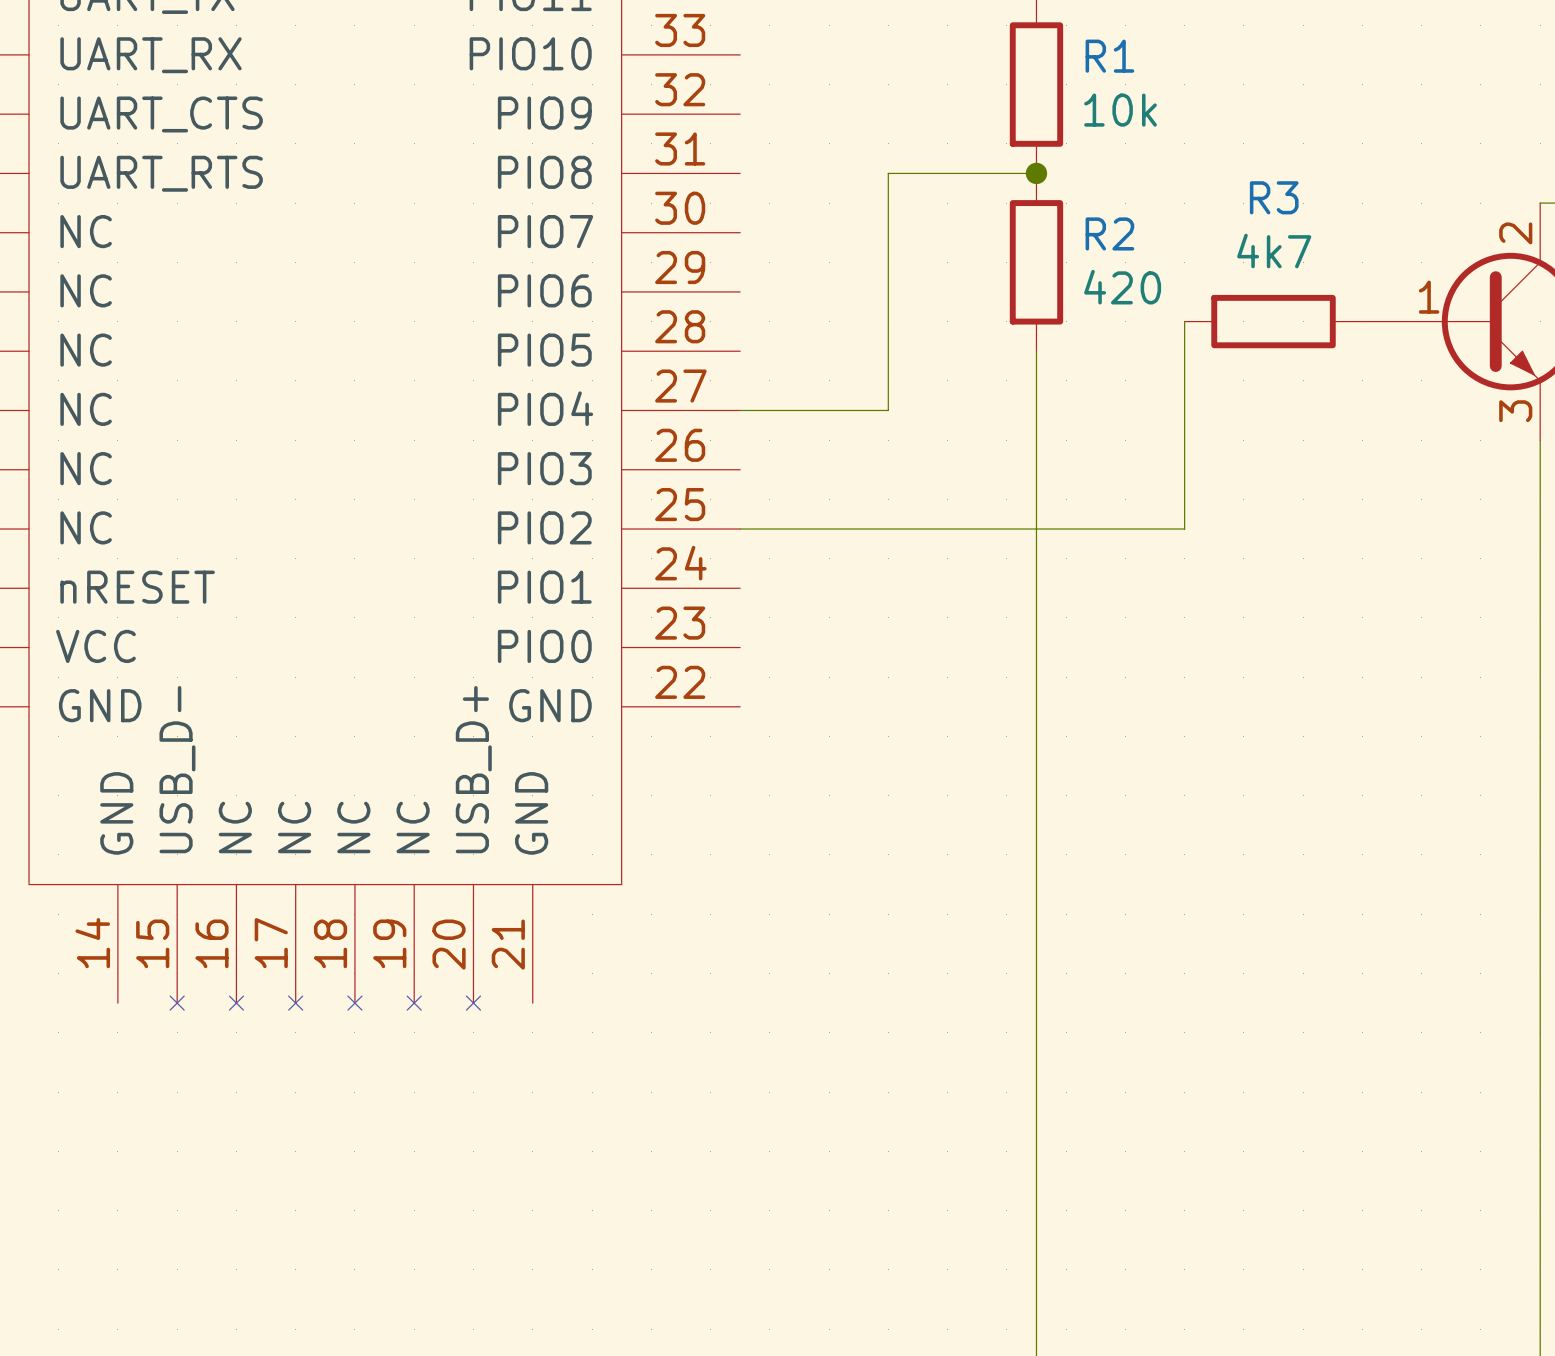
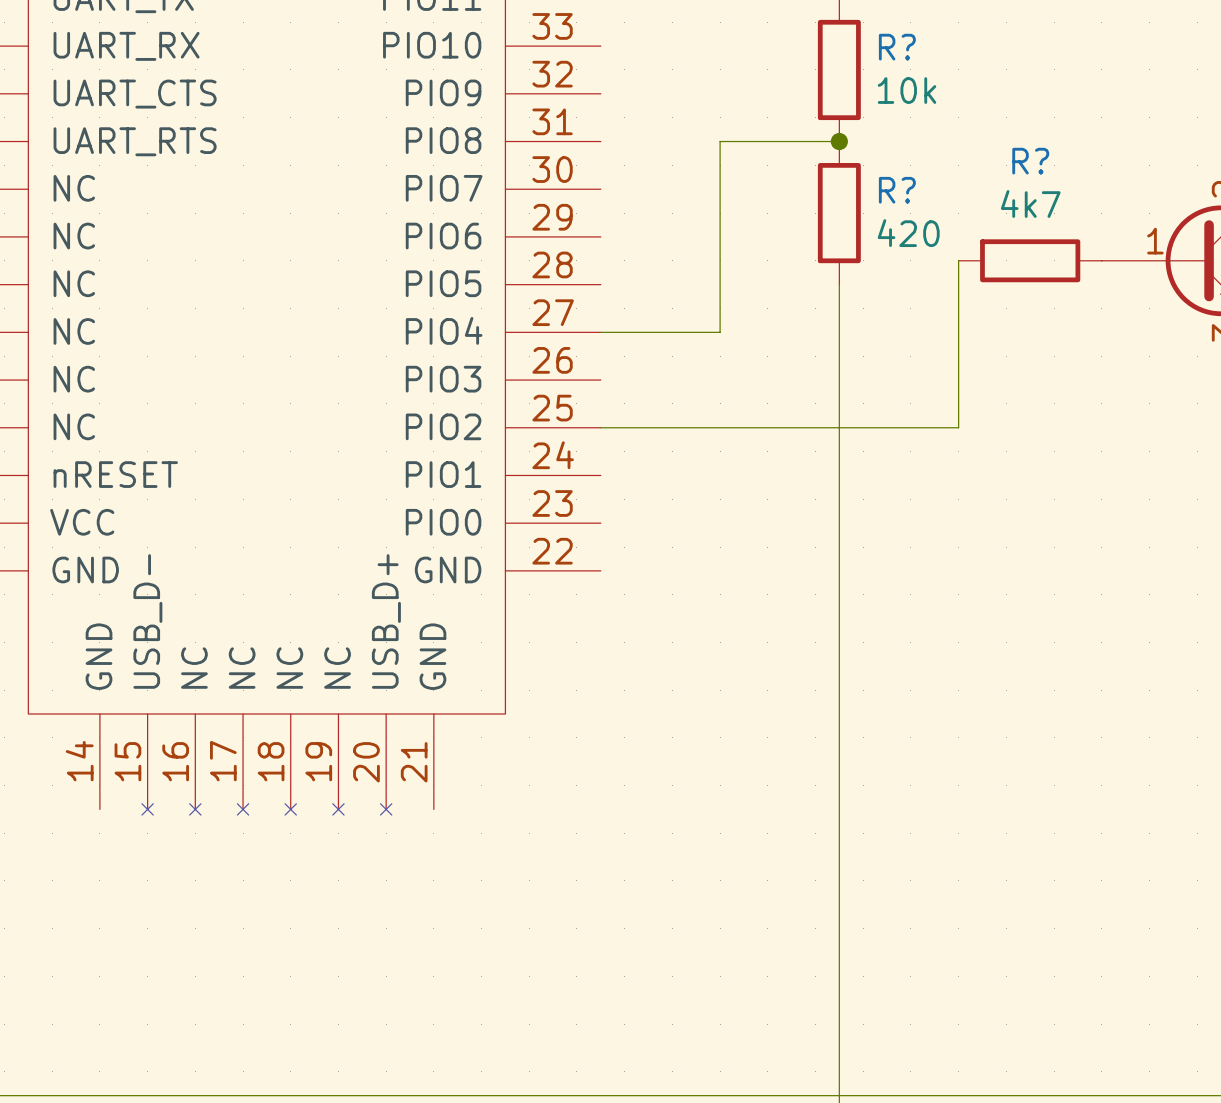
R1 name: R1 (1109, 56) -> R? (897, 47)
R3 name: R3 (1274, 197) -> R? (1030, 161)
R2 name: R2 (1109, 233) -> R? (897, 190)

